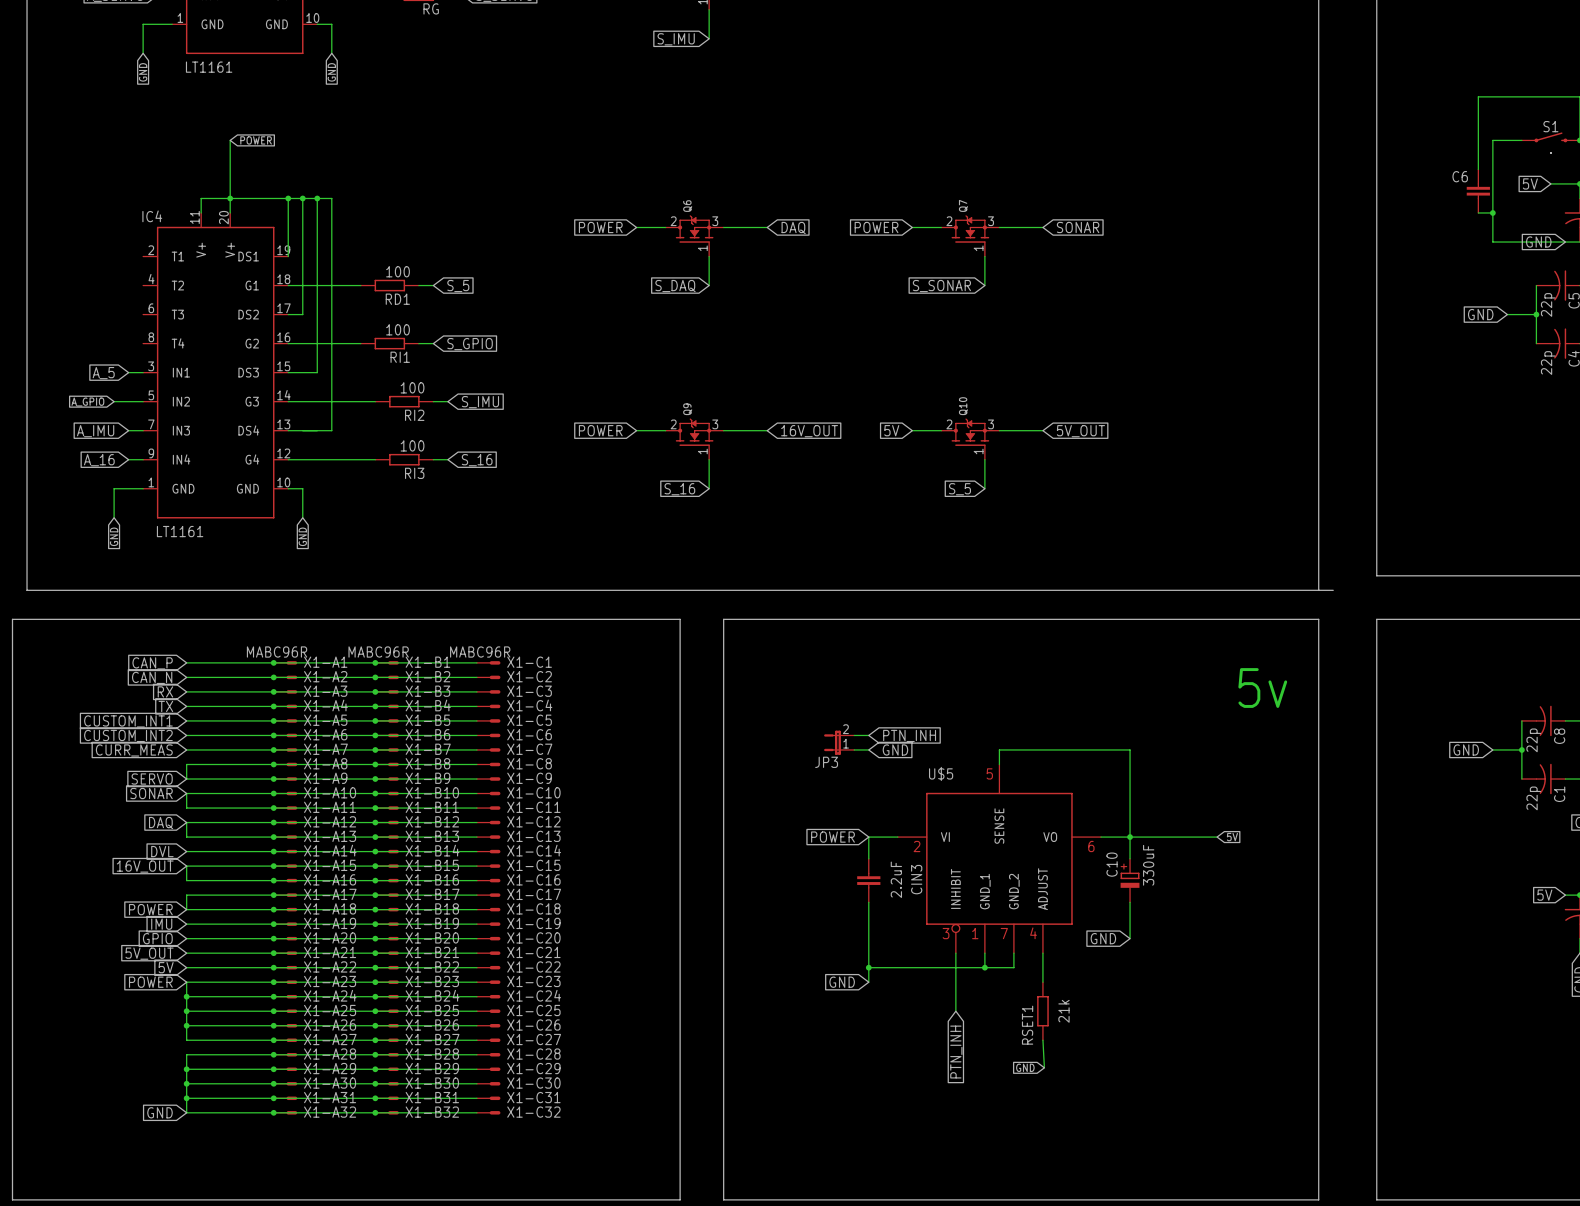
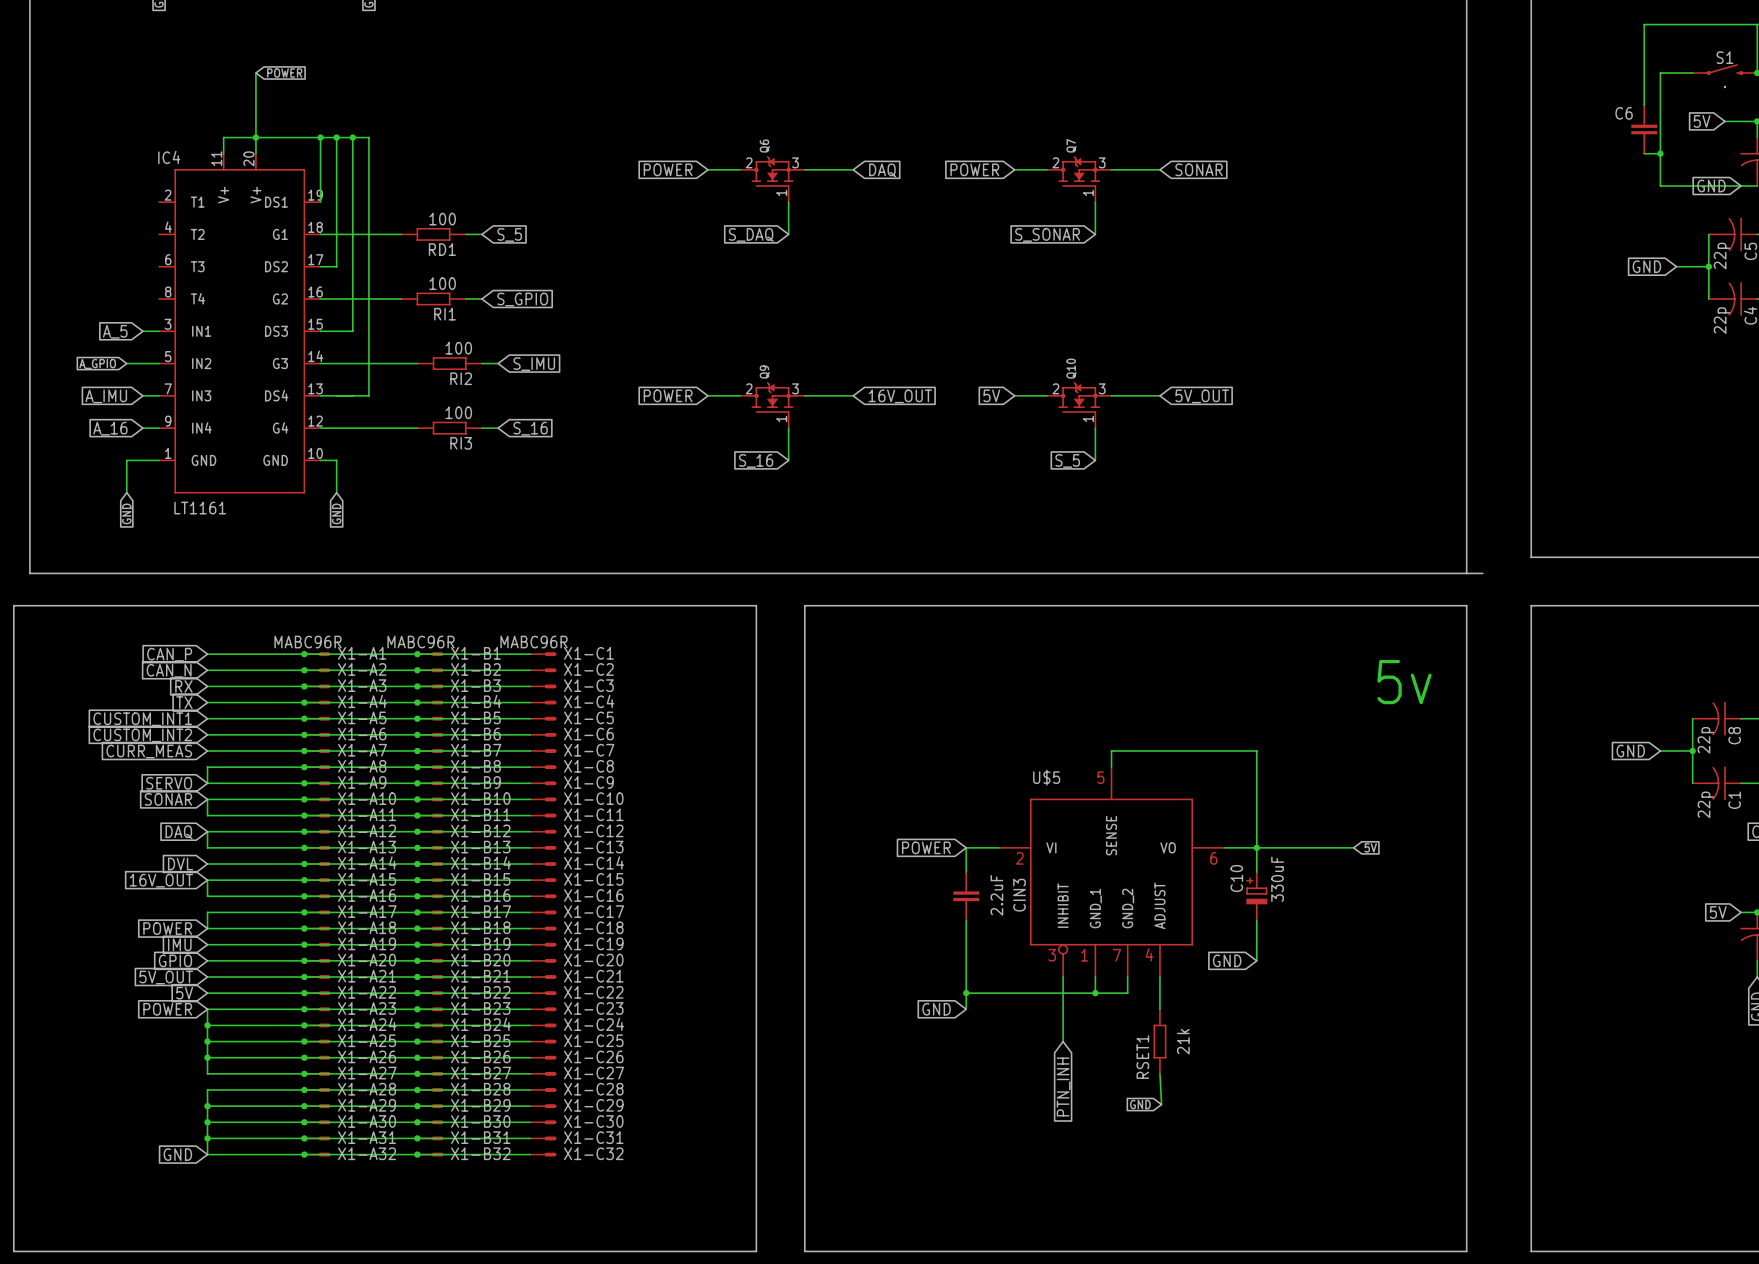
wire: (854, 735) (868, 735) -> none
global label: PTN_INH (909, 735) -> none
JP3: (839, 742) -> none
wire: (854, 749) (868, 749) -> none
global label: GND (895, 749) -> none

